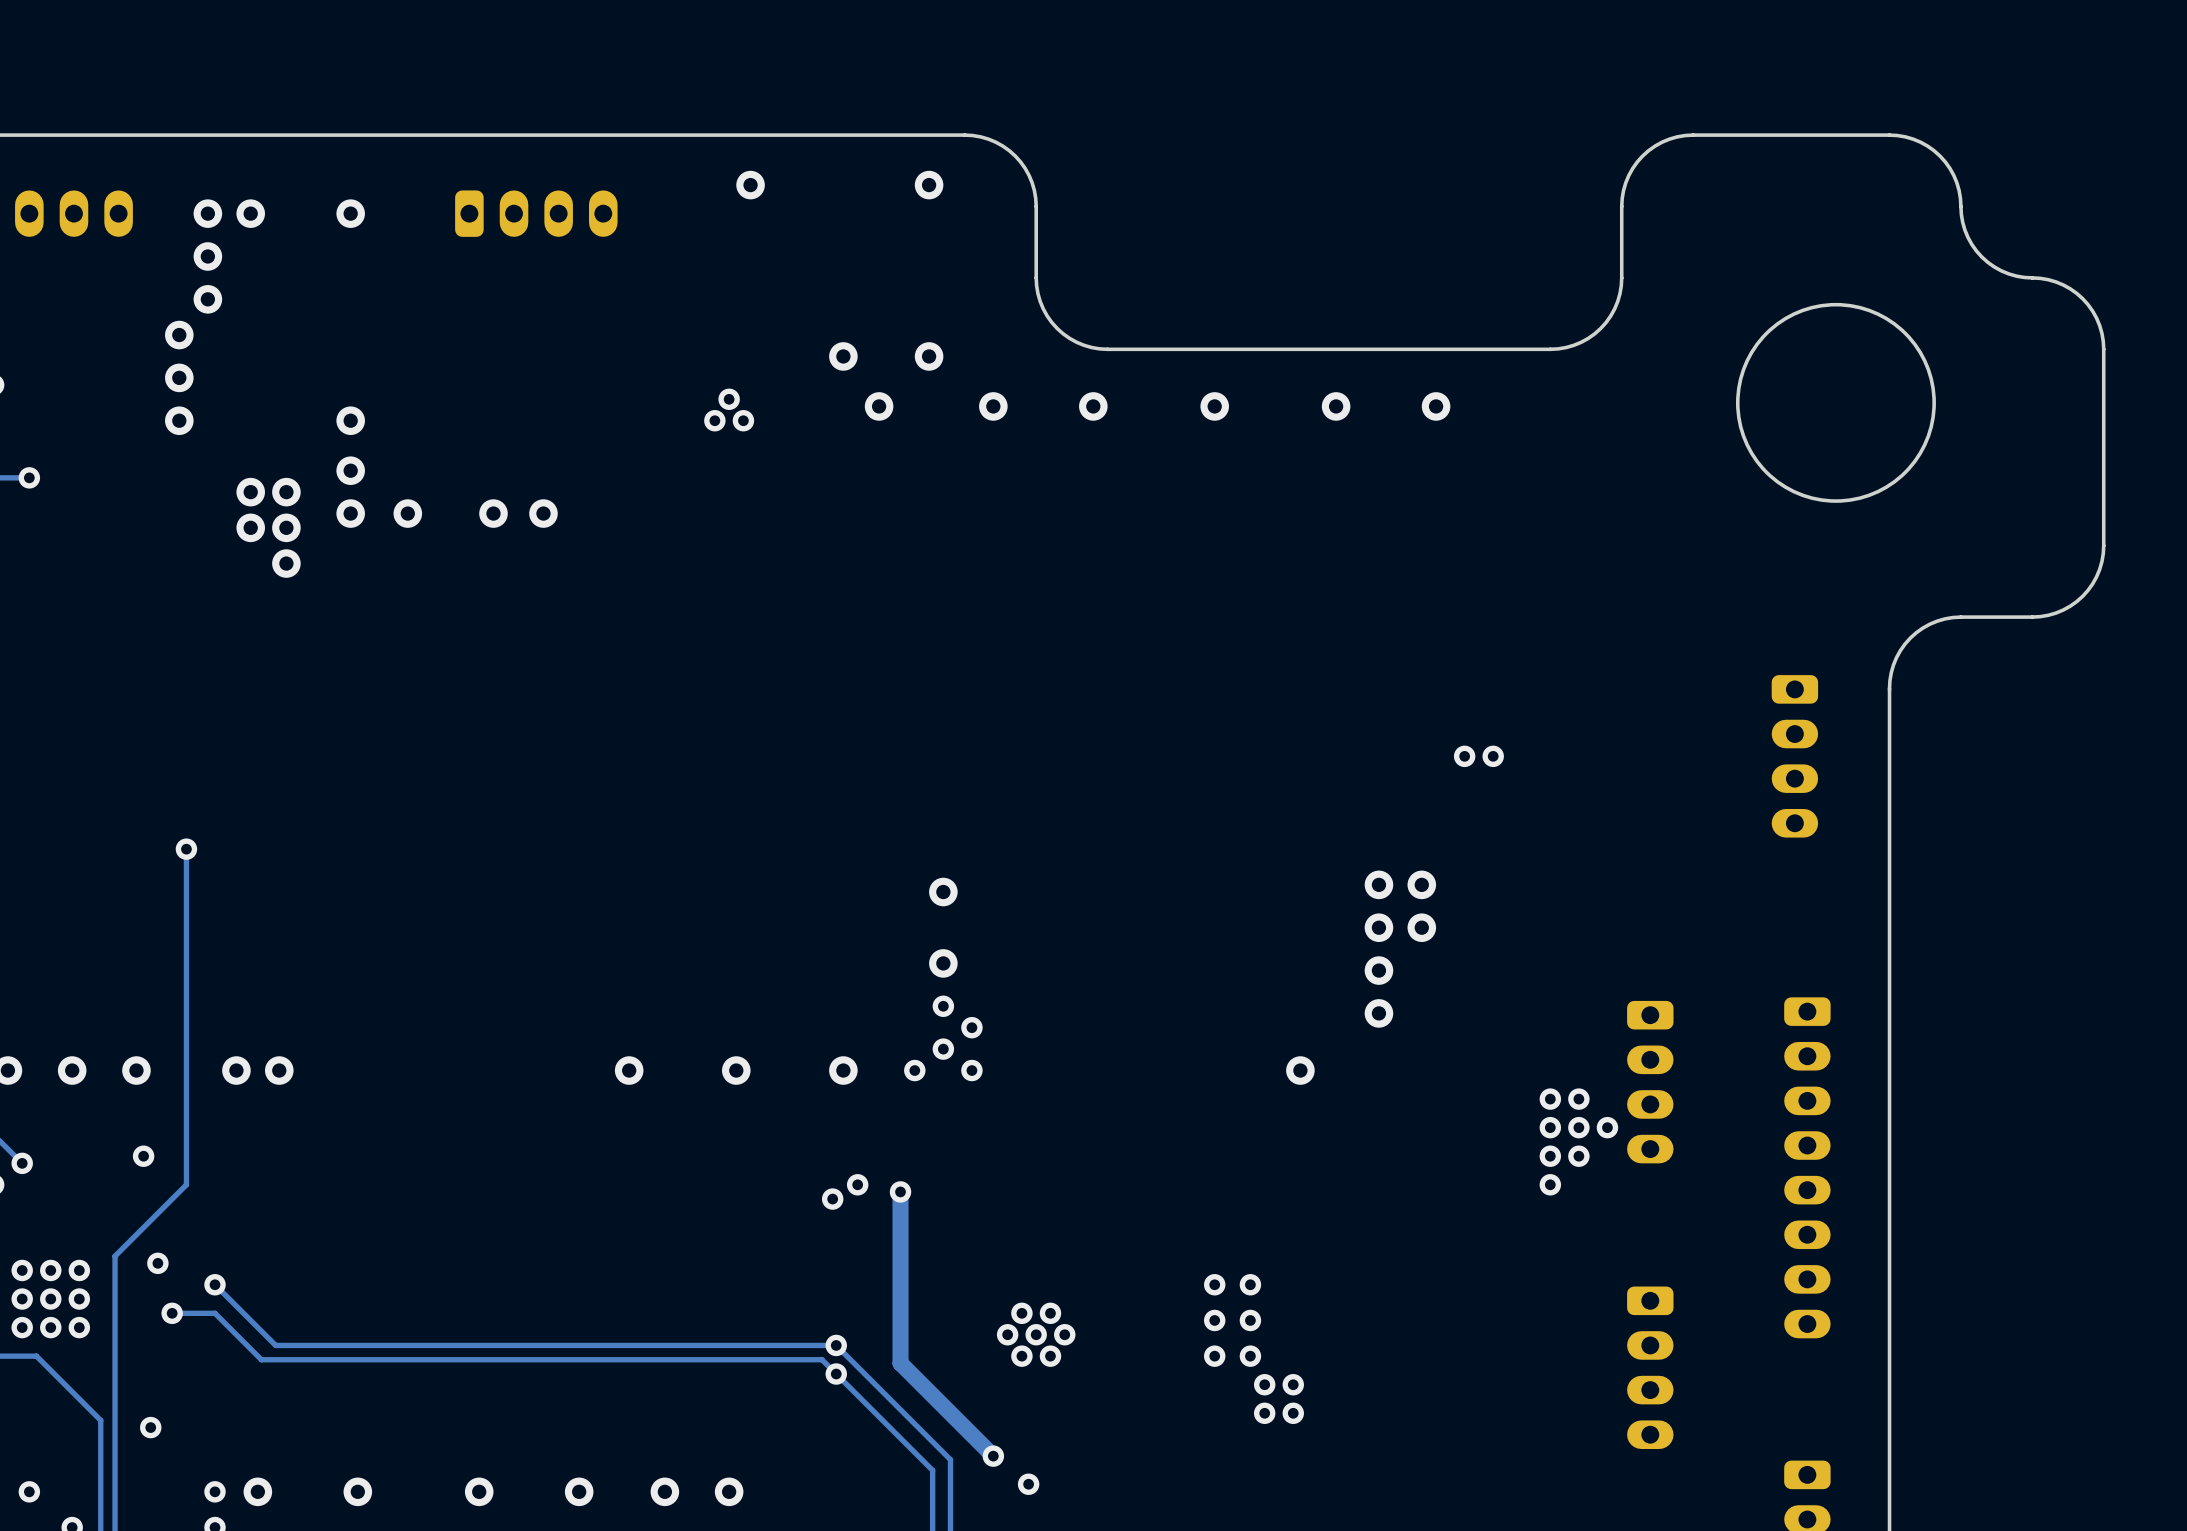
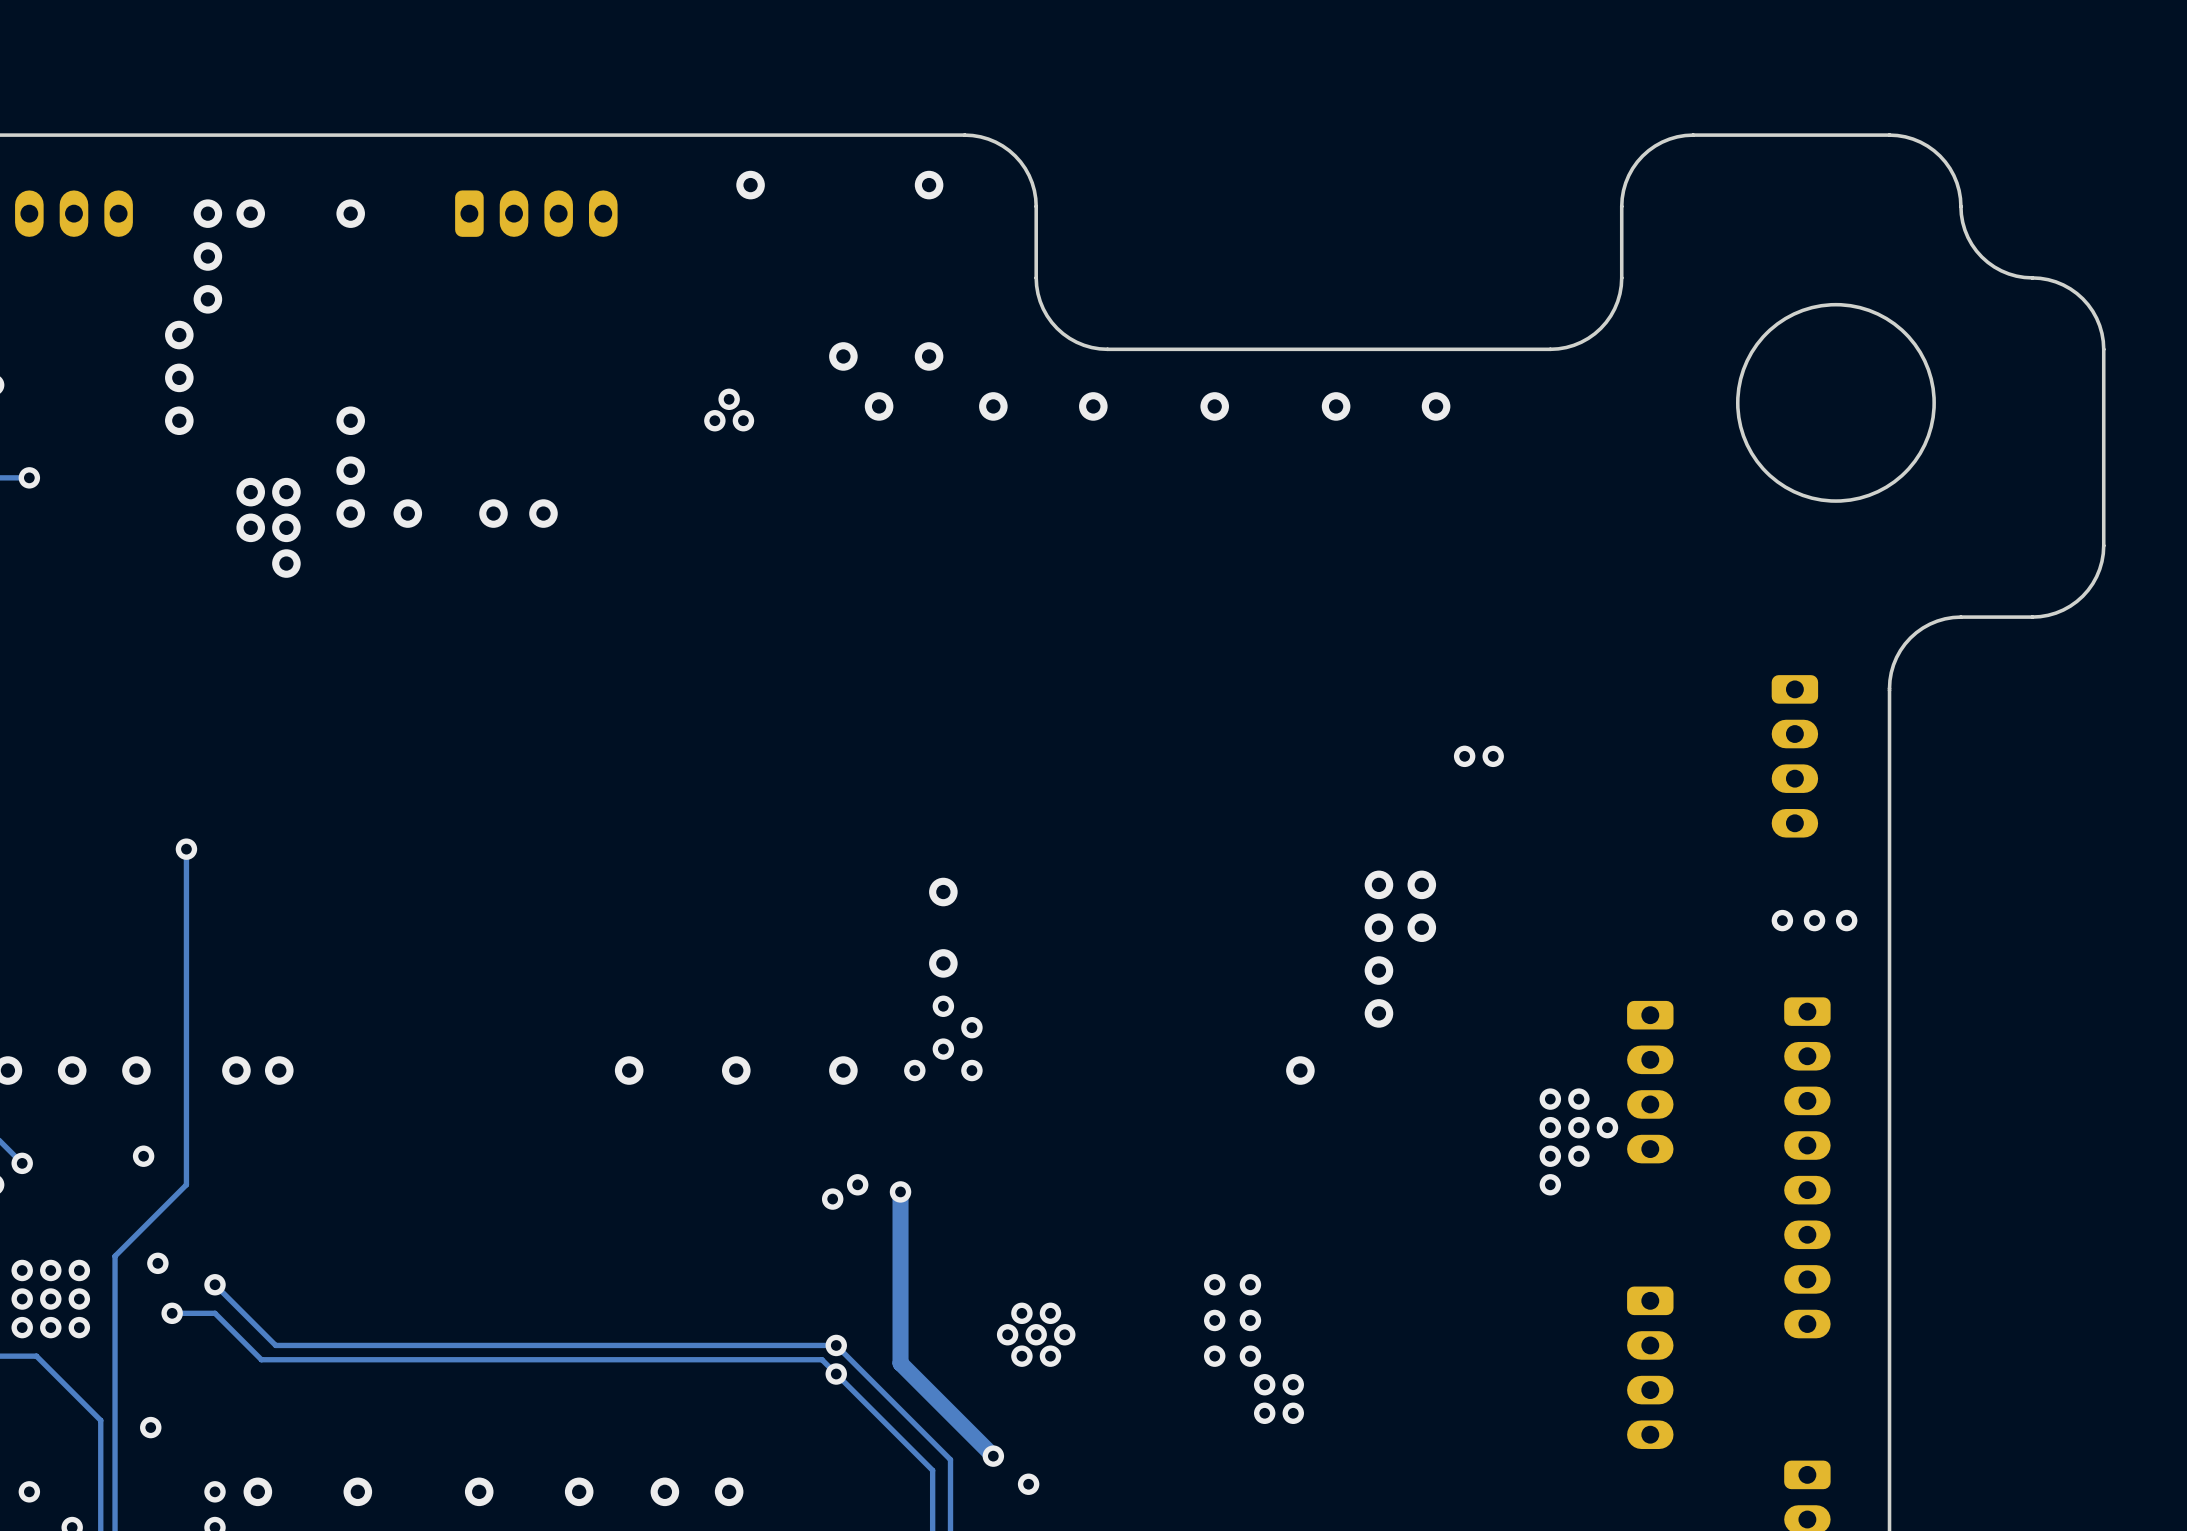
via: none -> (1782, 920)
via: none -> (1814, 920)
via: none -> (1846, 920)

